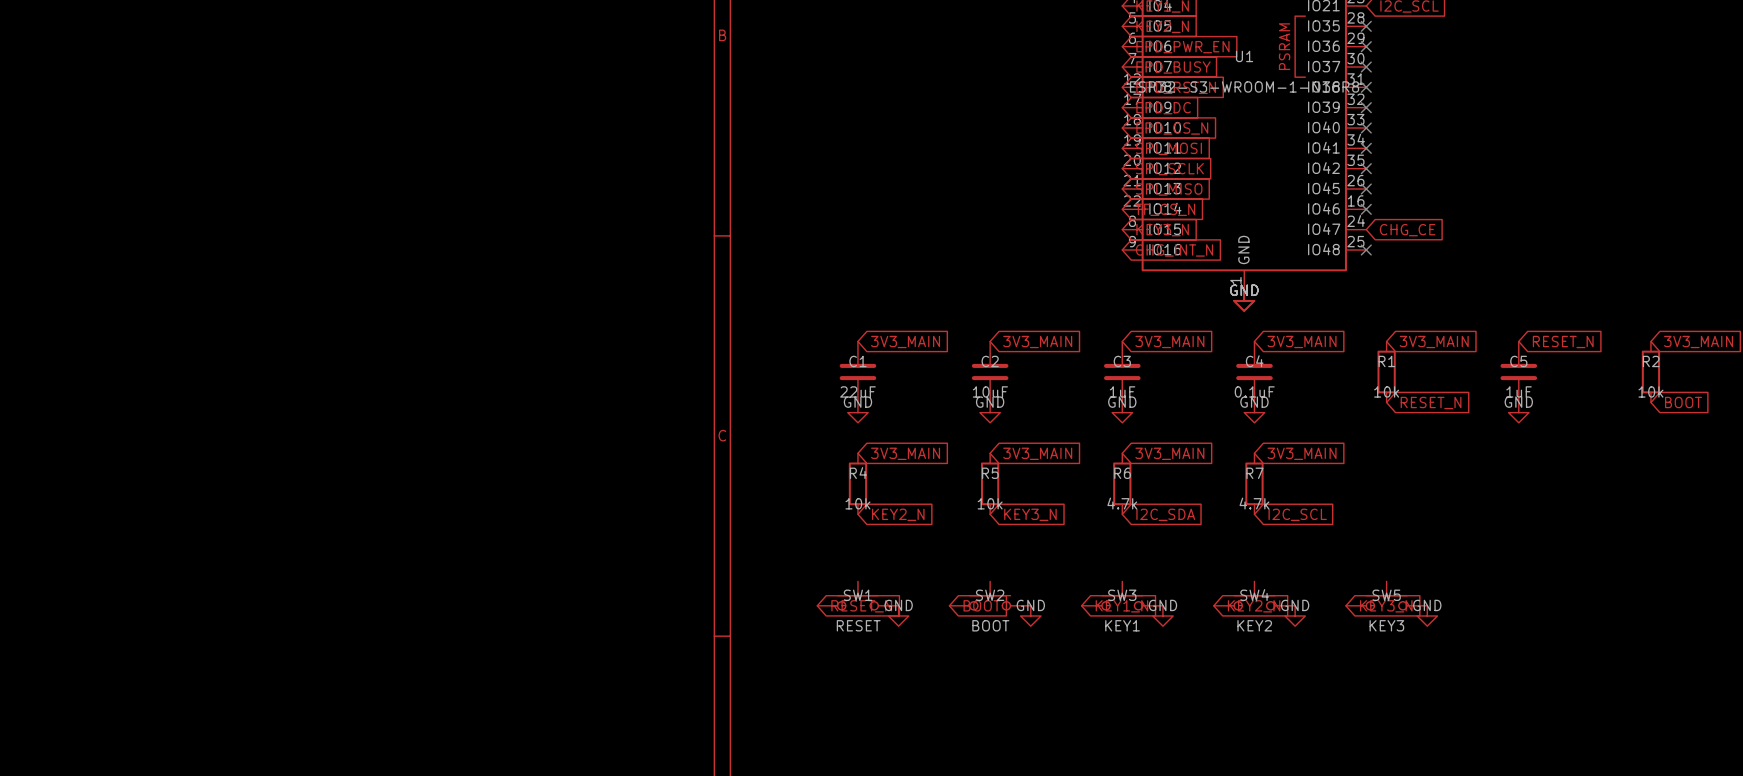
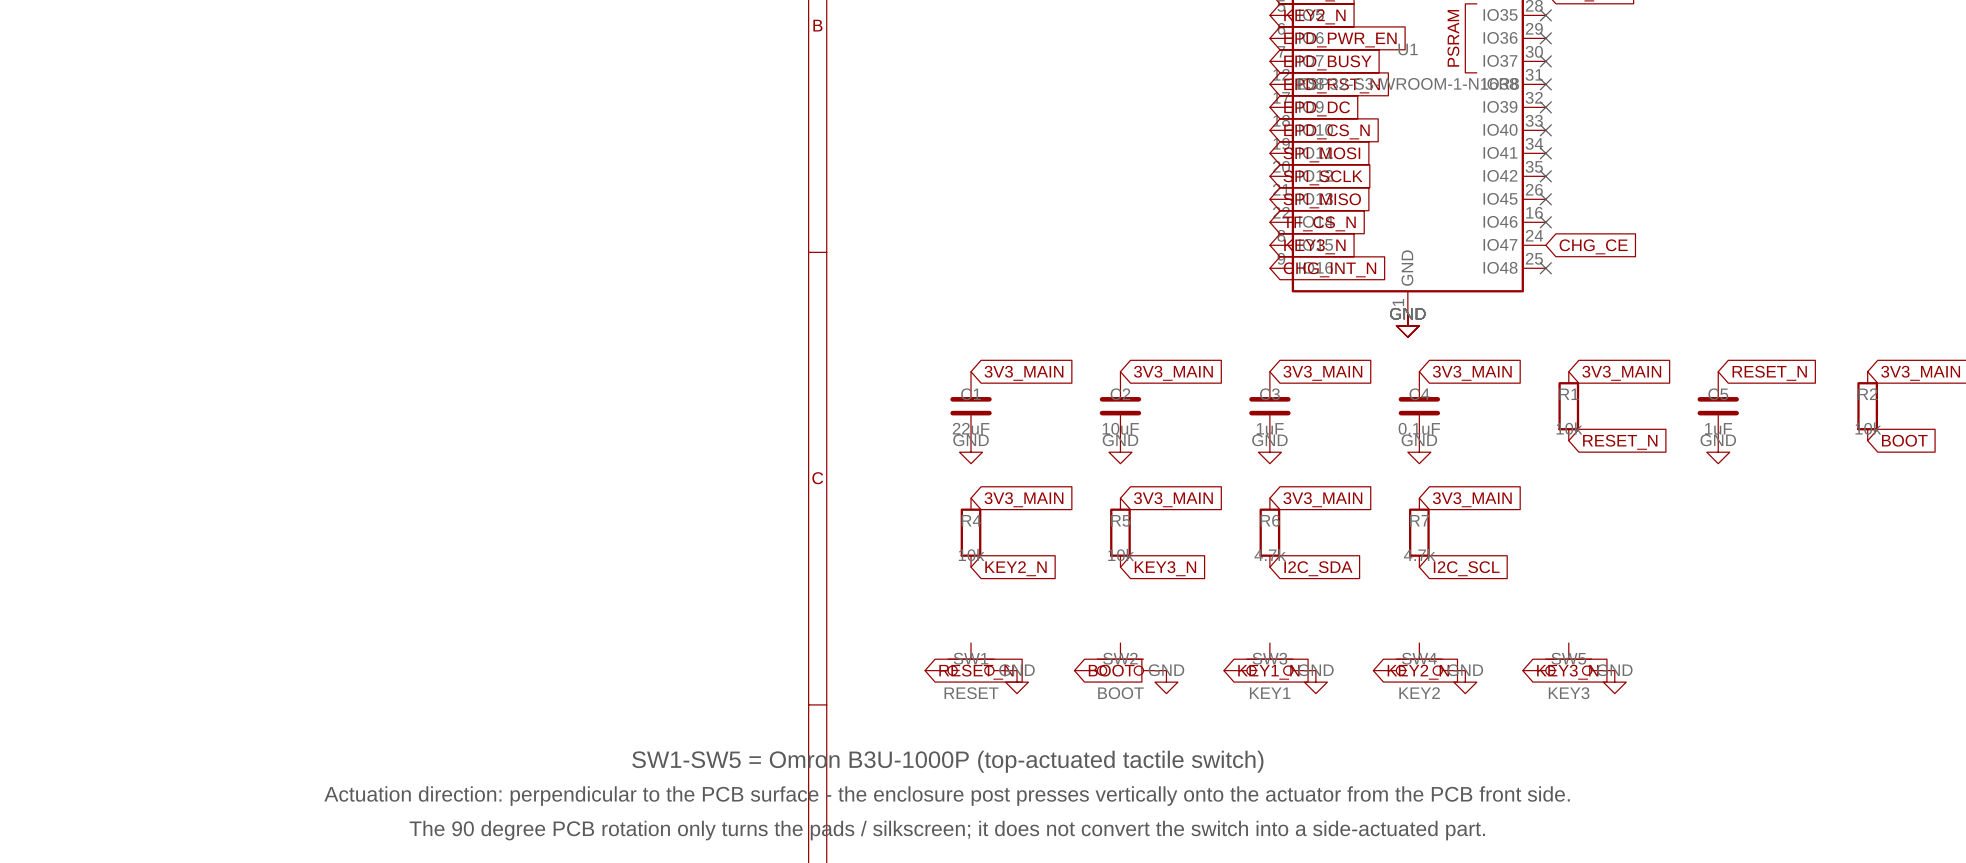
text: none -> SW1-SW5 = Omron B3U-1000P (top-actuated tactile switch) (947, 761)
text: none -> Actuation direction: perpendicular to the PCB surface - the enclosure post presses vertically onto the actuator from the PCB front side. (947, 796)
text: none -> The 90 degree PCB rotation only turns the pads / silkscreen; it does not convert the switch into a side-actuated part. (947, 830)

